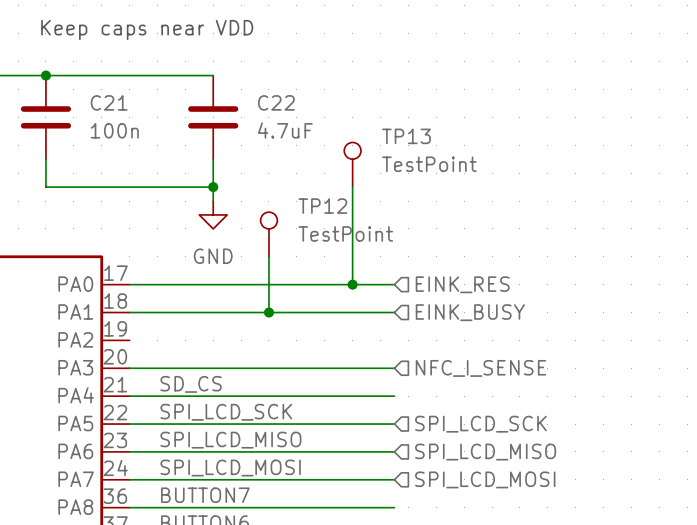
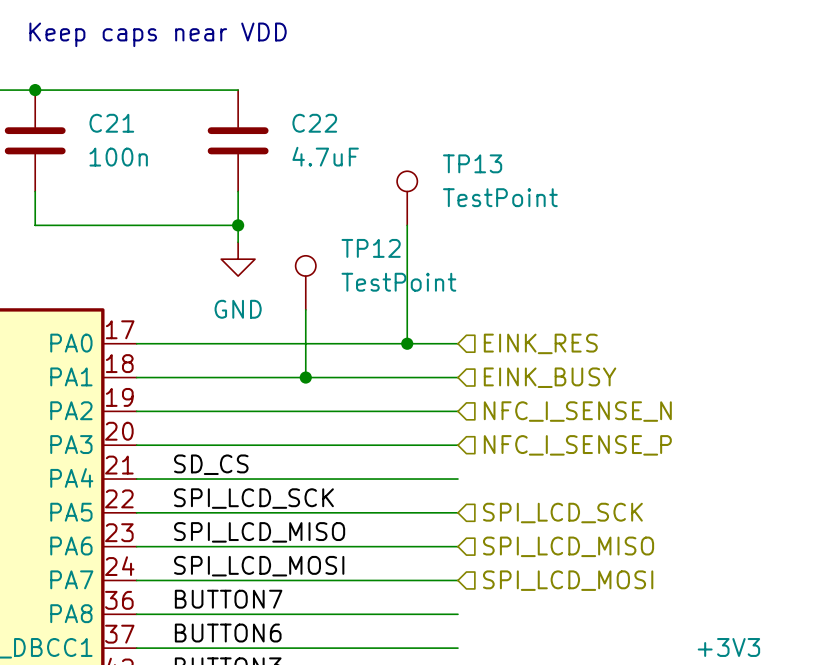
wire: none -> (136, 411) (457, 411)
hierarchical label: none -> NFC_I_SENSE_N (577, 411)
hierarchical label: NFC_I_SENSE (480, 368) -> NFC_I_SENSE_P (577, 445)

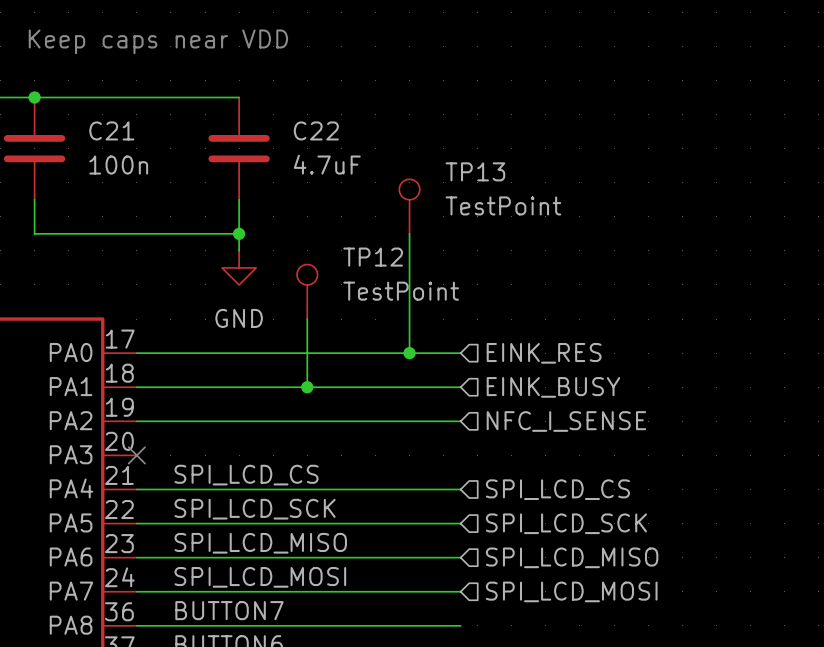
hierarchical label: NFC_I_SENSE_N (577, 411) -> NFC_I_SENSE (566, 421)
wire: (136, 445) (457, 445) -> none
no-connect mark: none -> (136, 455)
hierarchical label: NFC_I_SENSE_P (577, 445) -> none
label: SD_CS (211, 464) -> SPI_LCD_CS (246, 475)
hierarchical label: none -> SPI_LCD_CS (557, 489)

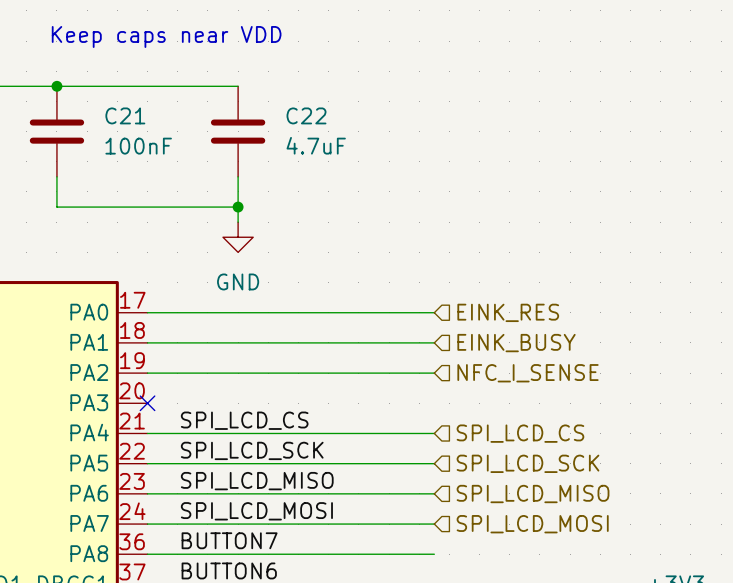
C21 value: 100n (118, 165) -> 100nF (138, 146)
TP13: TestPoint (409, 206) -> none
wire: (409, 233) (409, 353) -> none
TP12: TestPoint (307, 291) -> none
wire: (307, 319) (307, 387) -> none
junction: (409, 353) -> none
junction: (307, 387) -> none

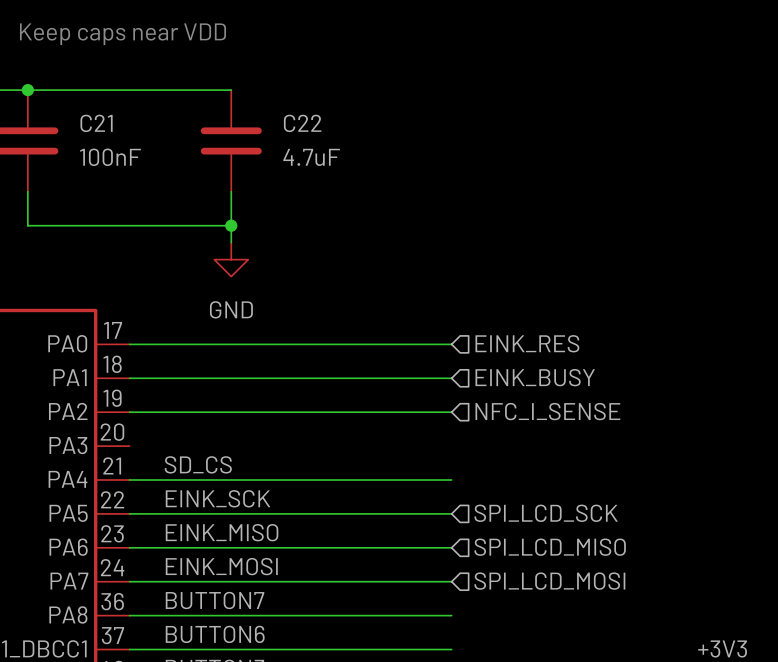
no-connect mark: (147, 403) -> none
label: SPI_LCD_CS (244, 420) -> SD_CS (198, 464)
hierarchical label: SPI_LCD_CS (520, 433) -> none
label: SPI_LCD_SCK (252, 450) -> EINK_SCK (218, 498)
label: SPI_LCD_MISO (257, 481) -> EINK_MISO (222, 532)
label: SPI_LCD_MOSI (256, 511) -> EINK_MOSI (221, 566)

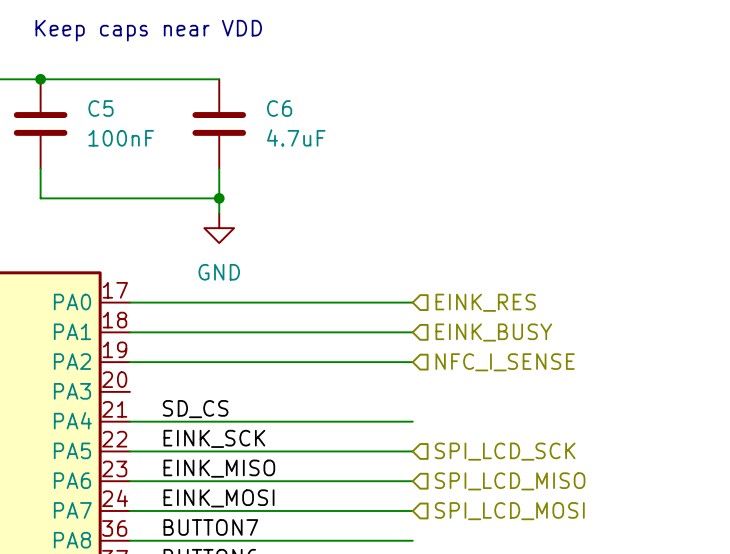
C21 name: C21 (96, 123) -> C5 (100, 108)
C22 name: C22 (302, 123) -> C6 (279, 108)

